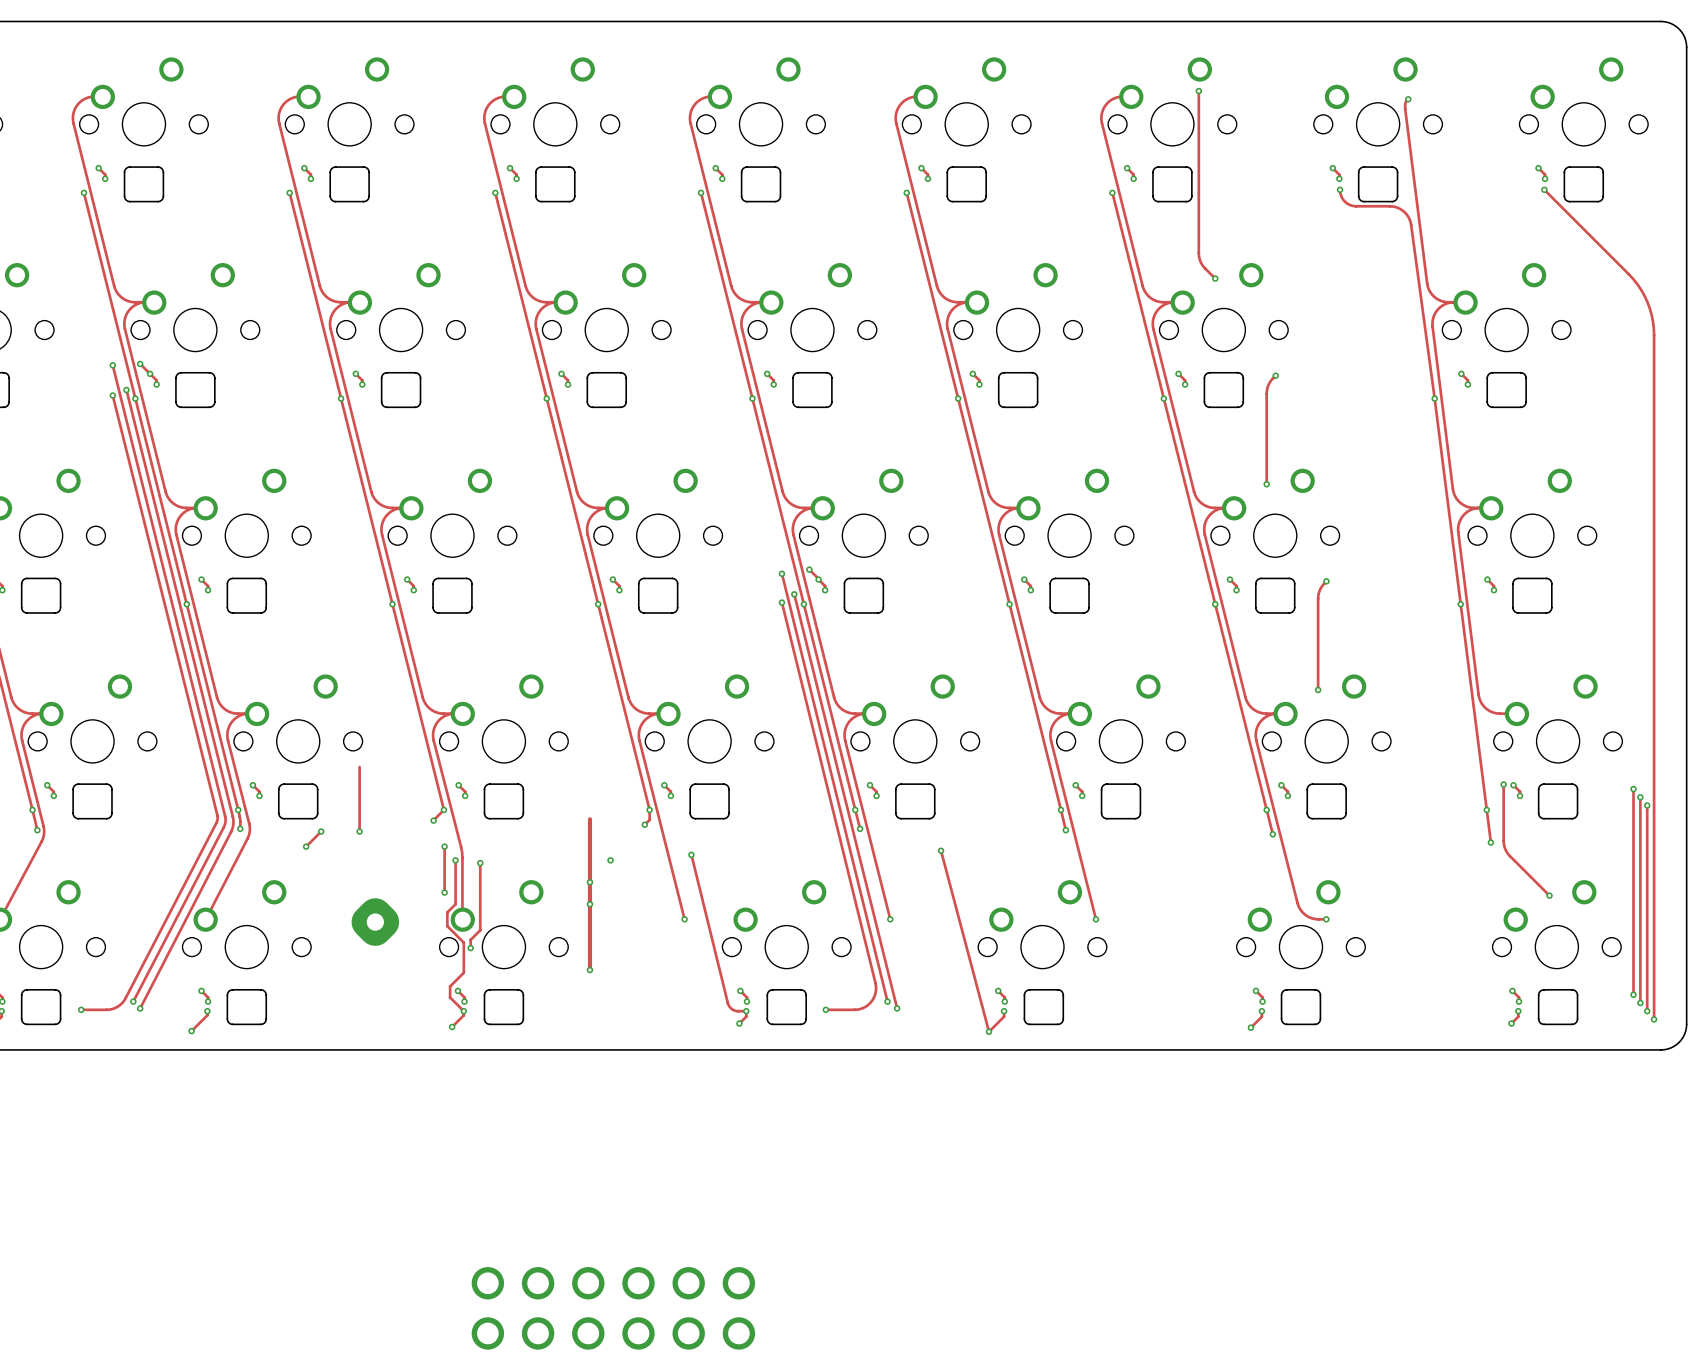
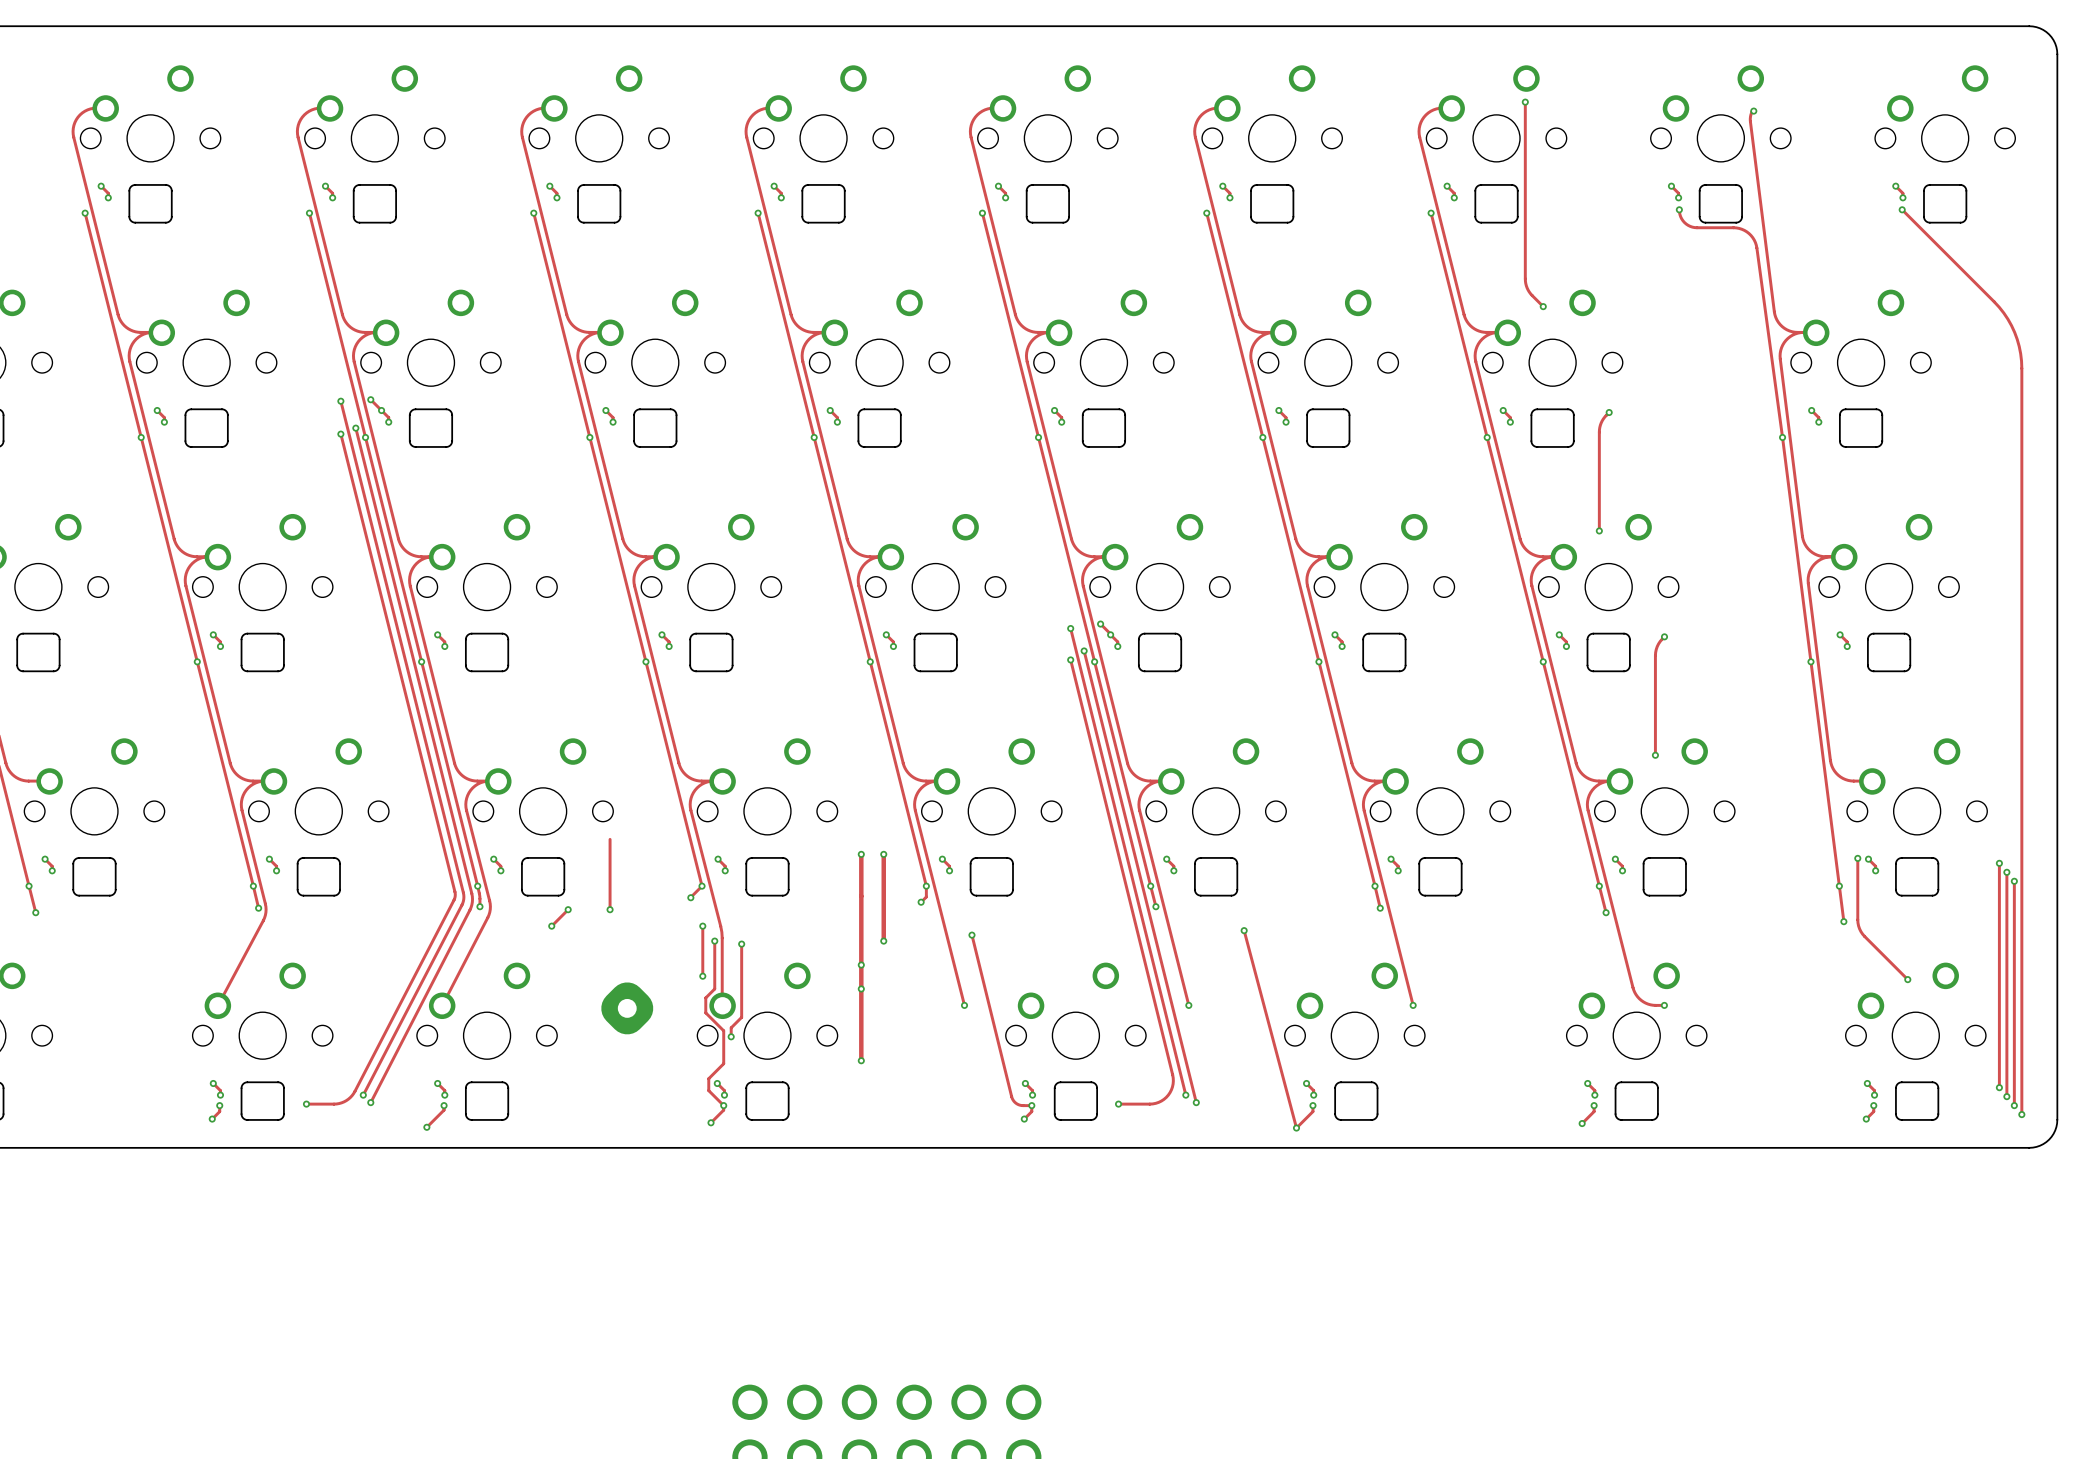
track: none -> (861, 854) (861, 896)
via: none -> (861, 854)
track: none -> (883, 854) (883, 941)
via: none -> (883, 854)

